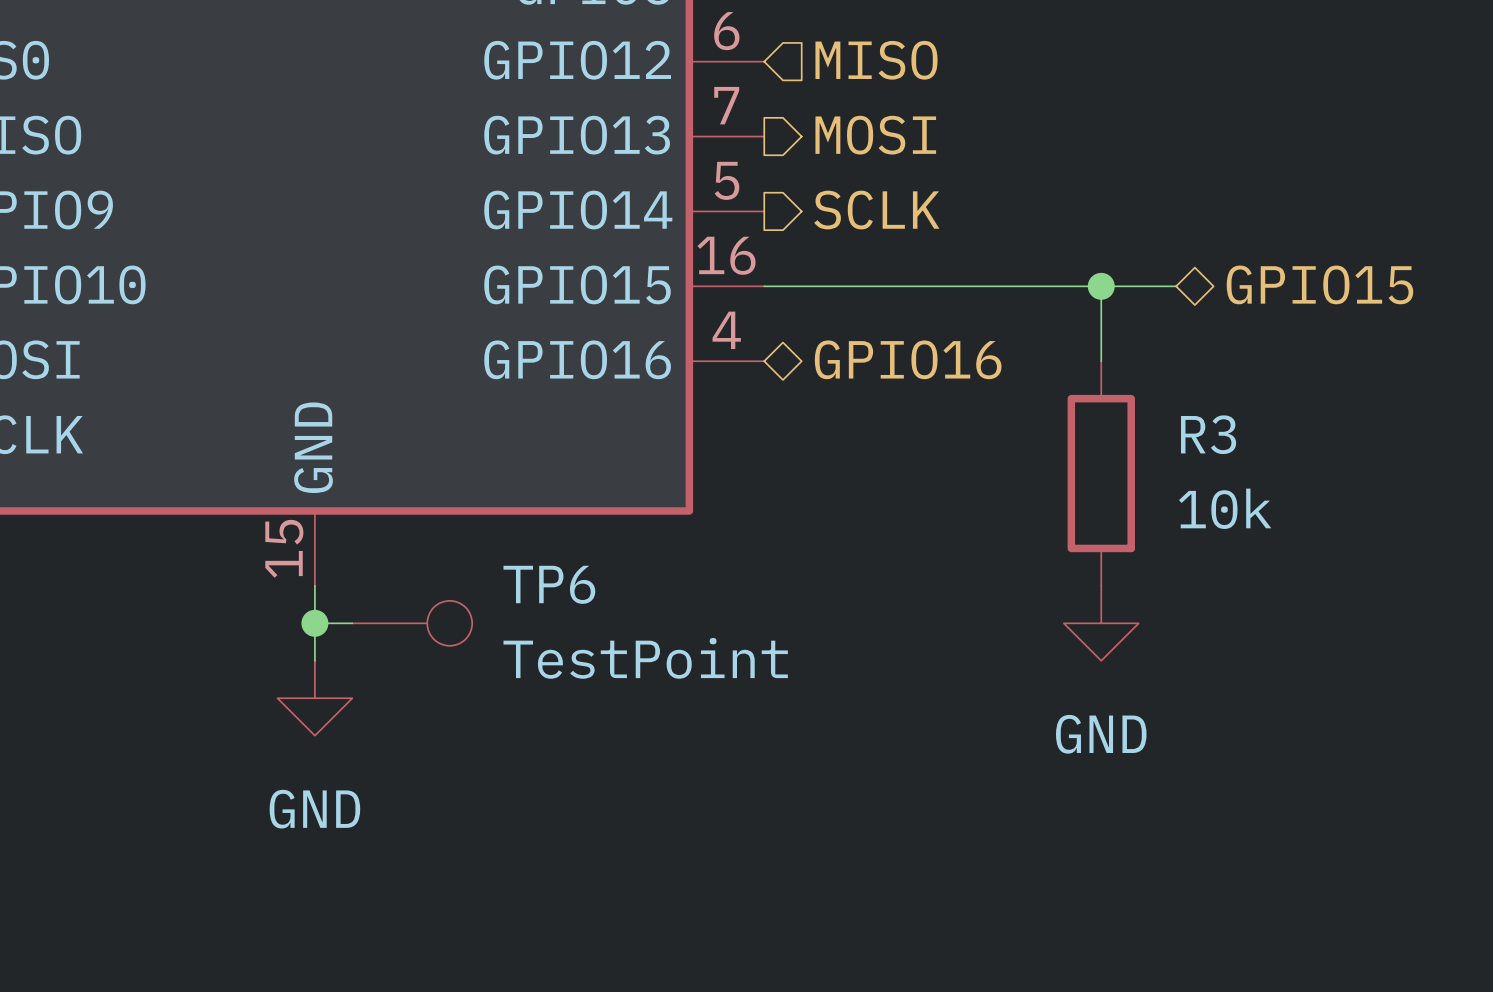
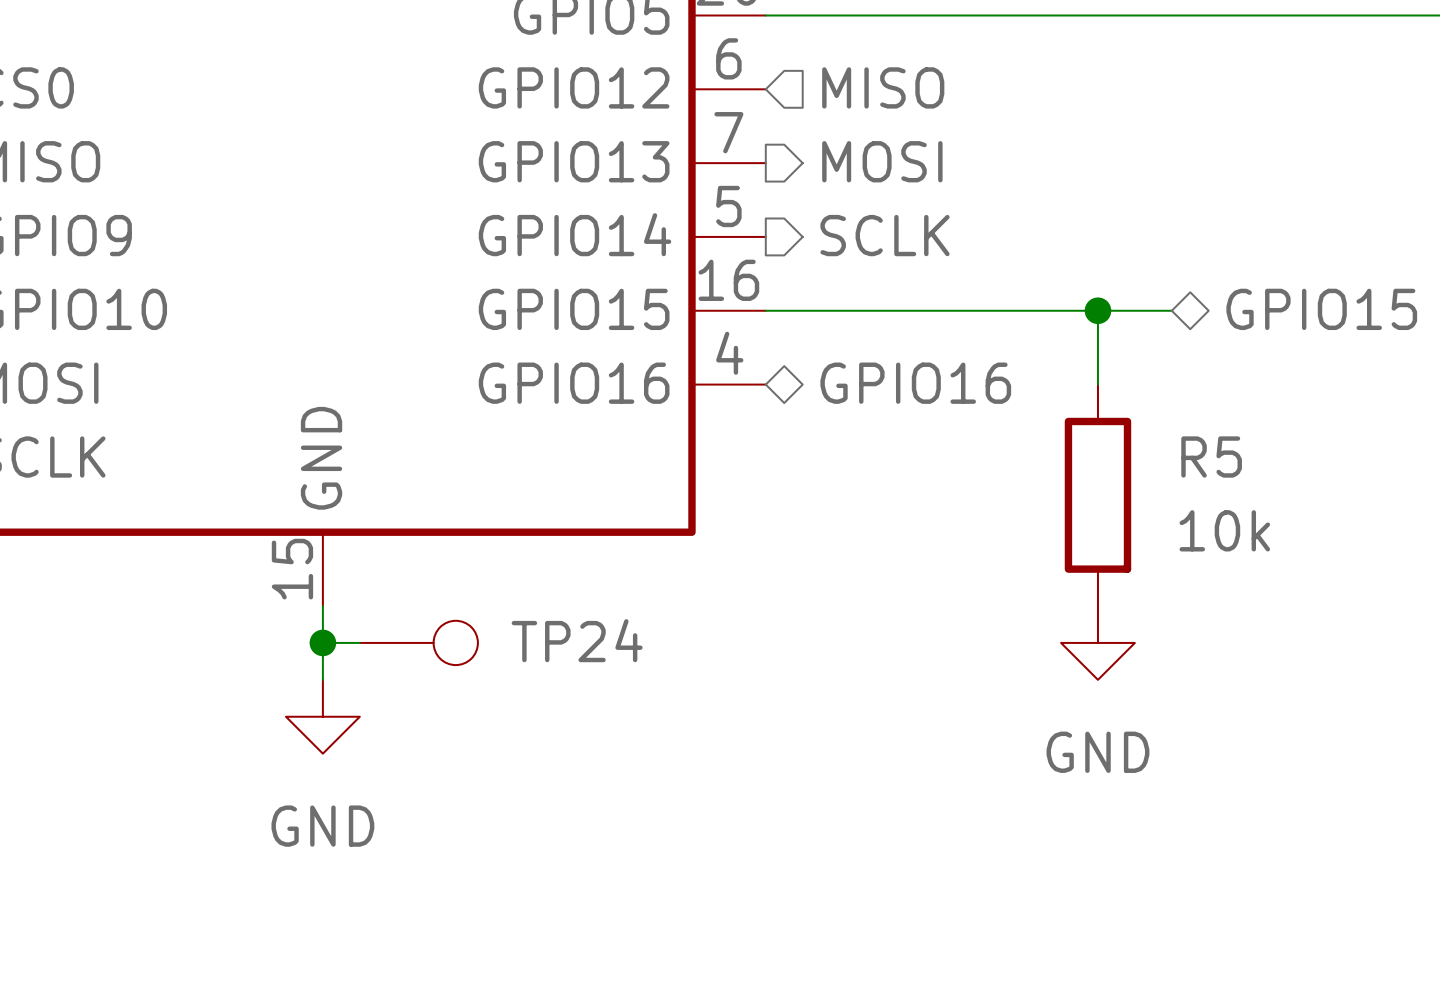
R3 name: R3 (1208, 434) -> R5 (1211, 457)
TP6 name: TP6 (549, 584) -> TP24 (577, 640)
TP6 value: TestPoint (645, 658) -> none

